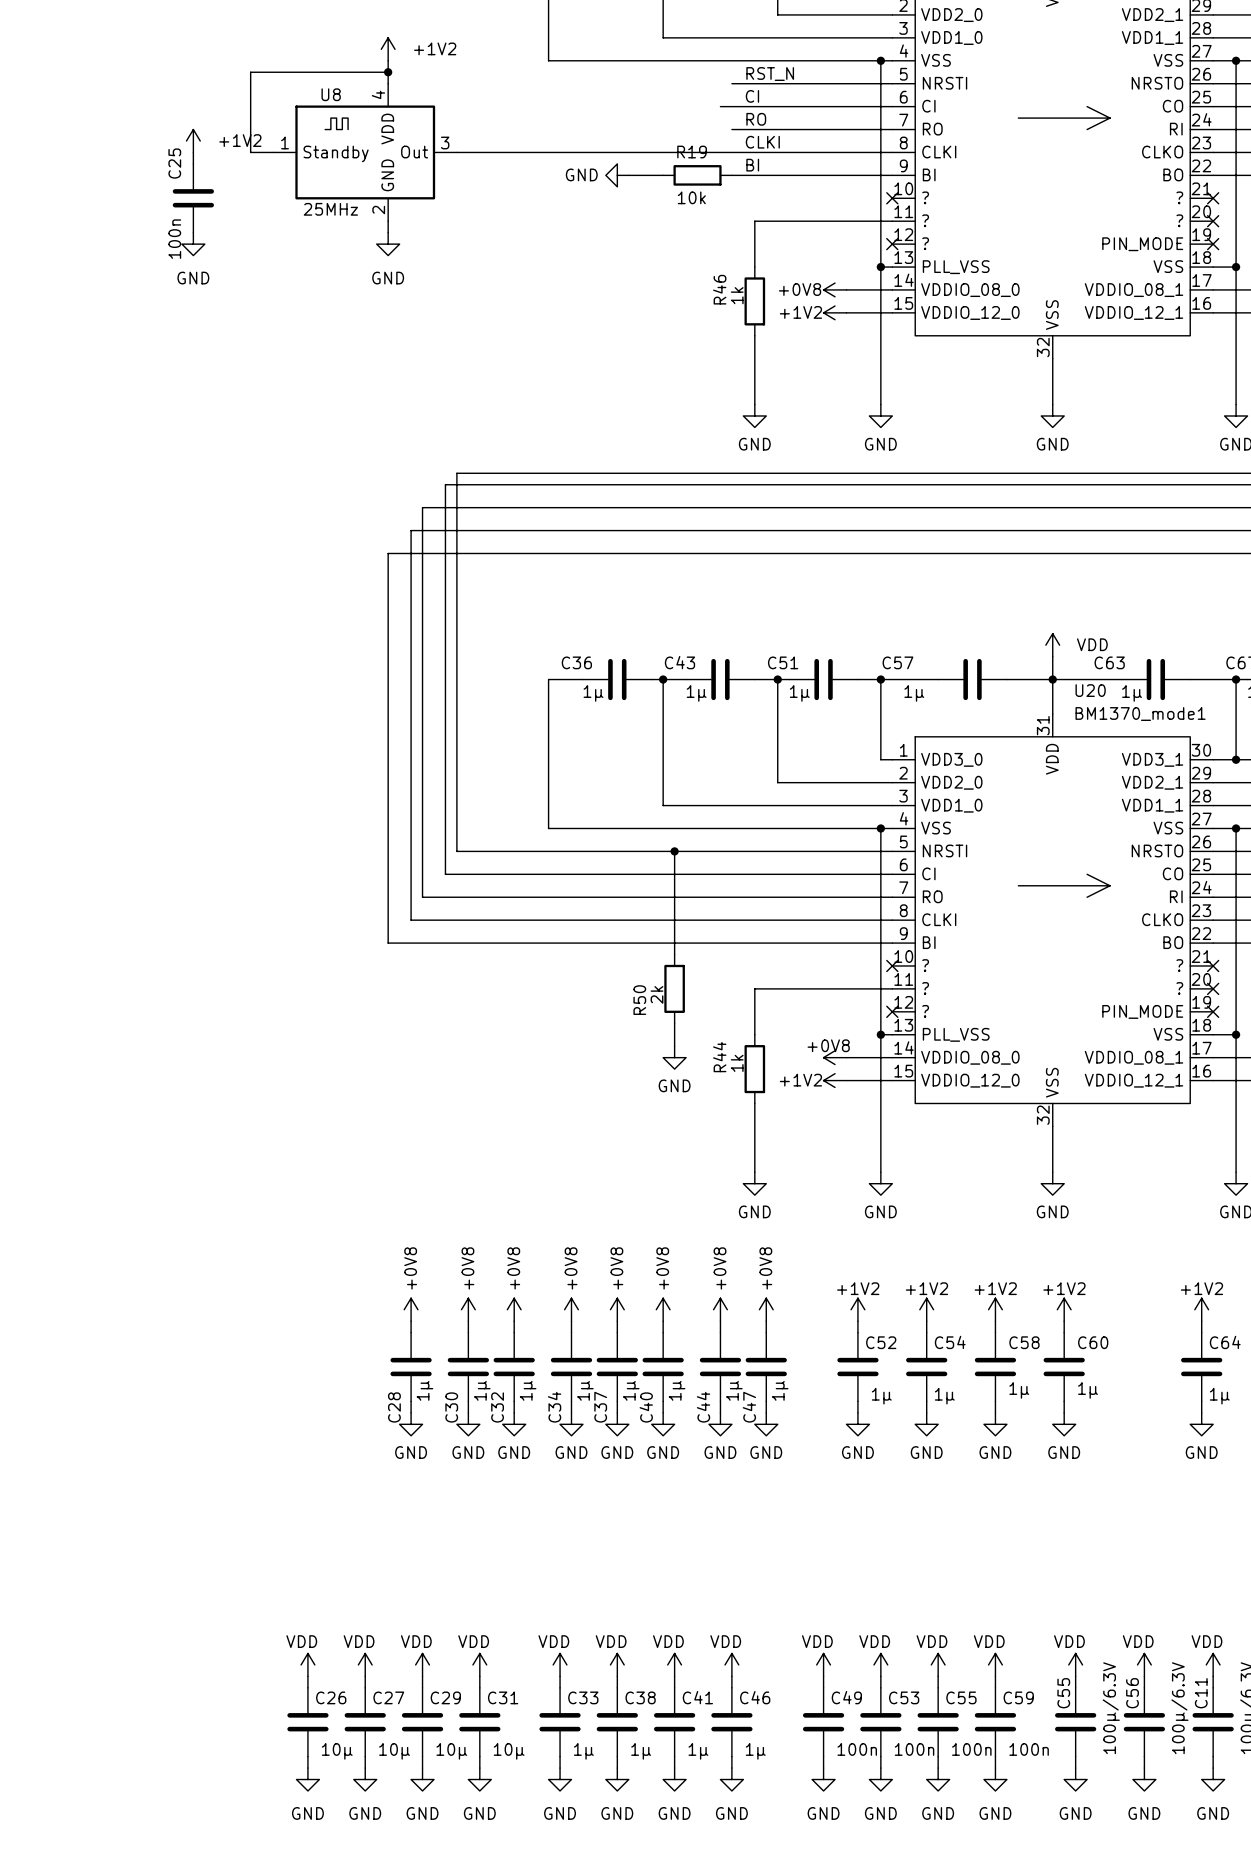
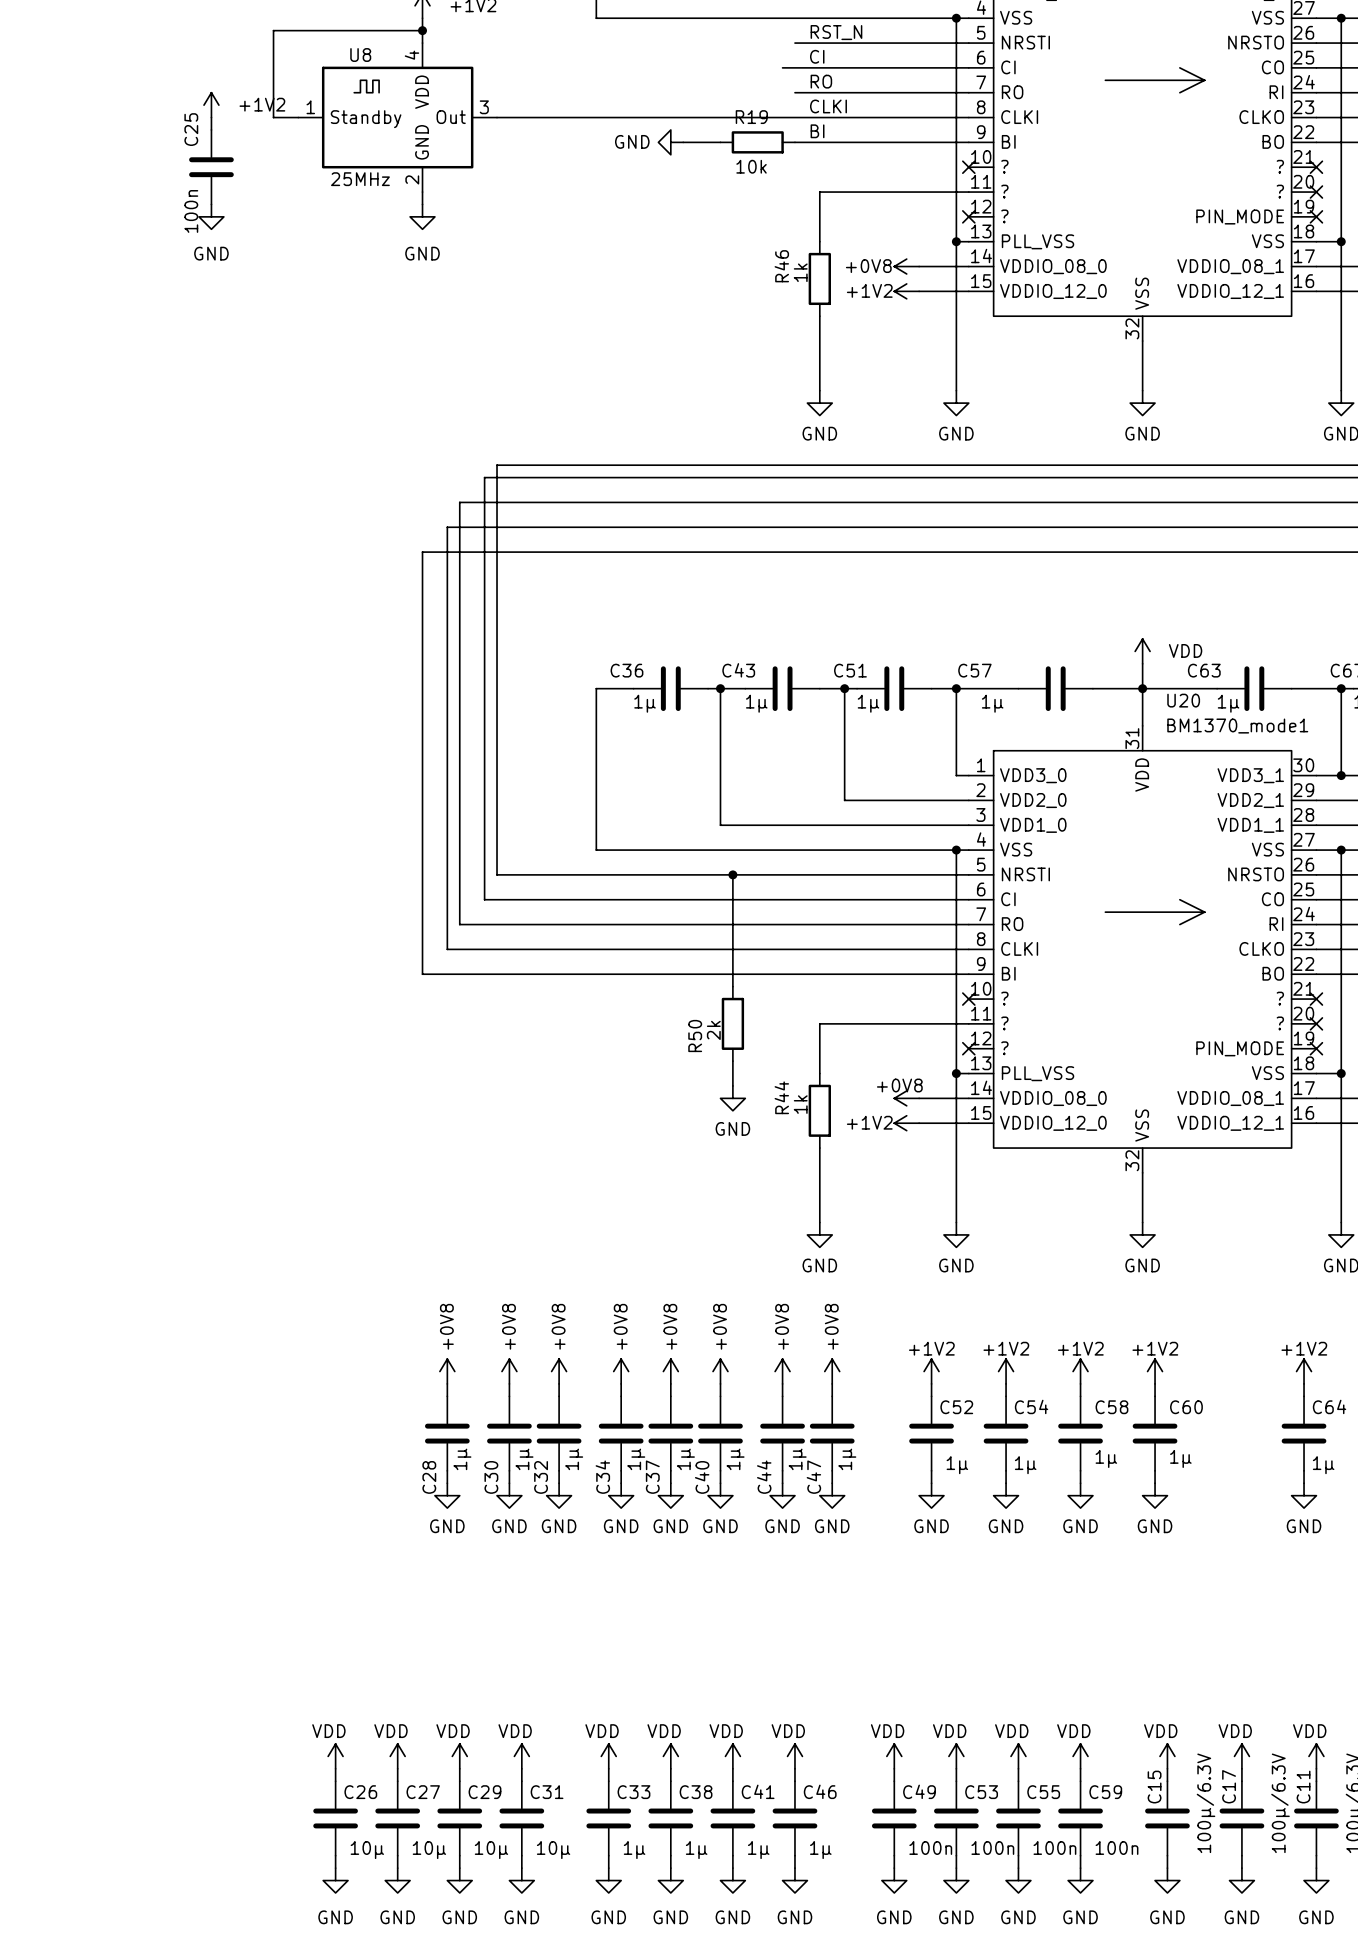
C55 name: C55 (1063, 1693) -> C15 (1154, 1787)
C56 name: C56 (1132, 1693) -> C17 (1229, 1786)

